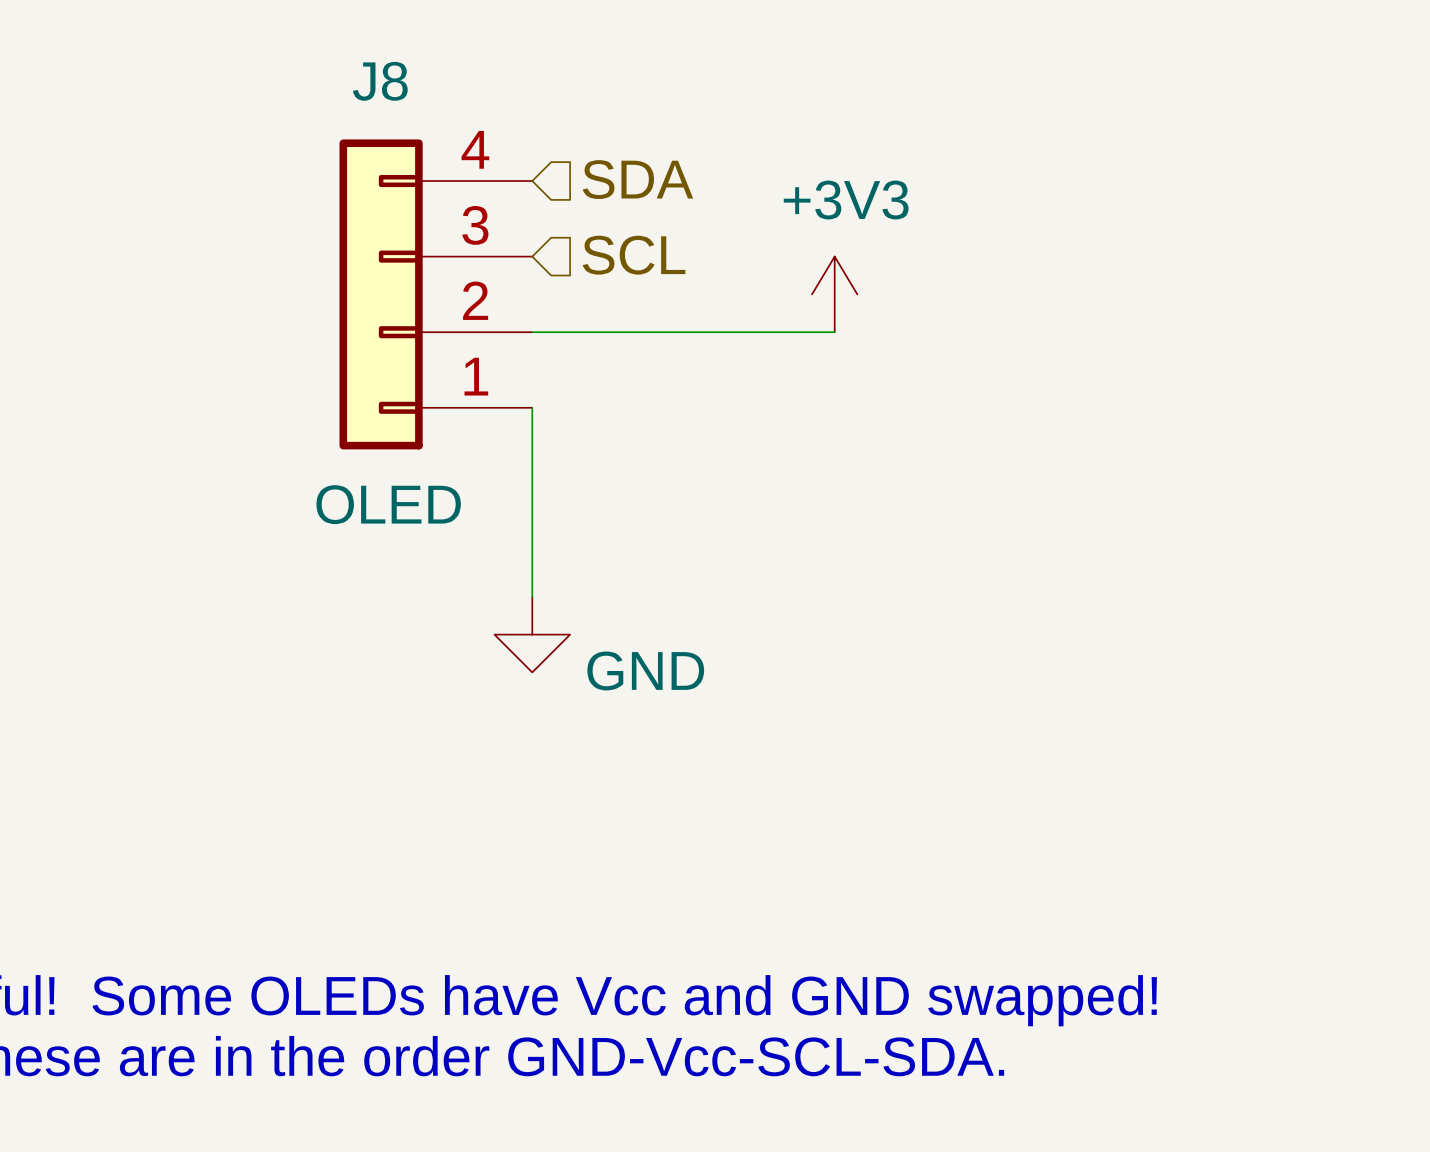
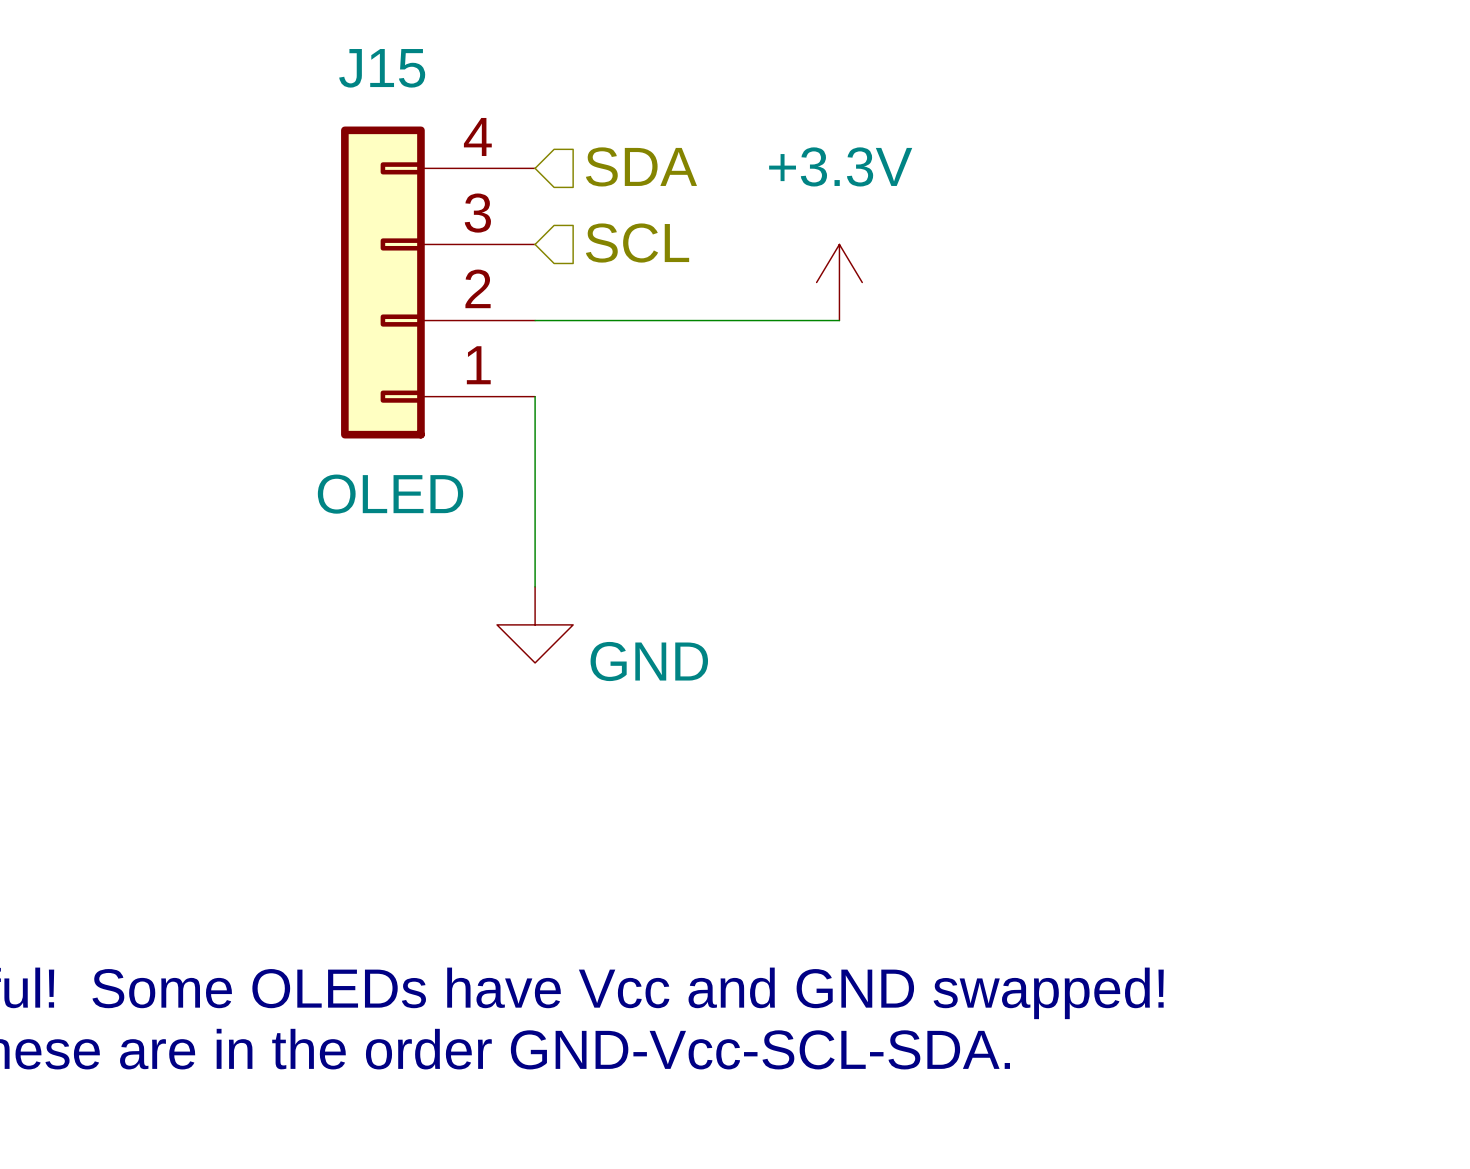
J8 name: J8 (380, 81) -> J15 (382, 68)
power symbol: +3V3 (834, 294) -> +3.3V (839, 282)

